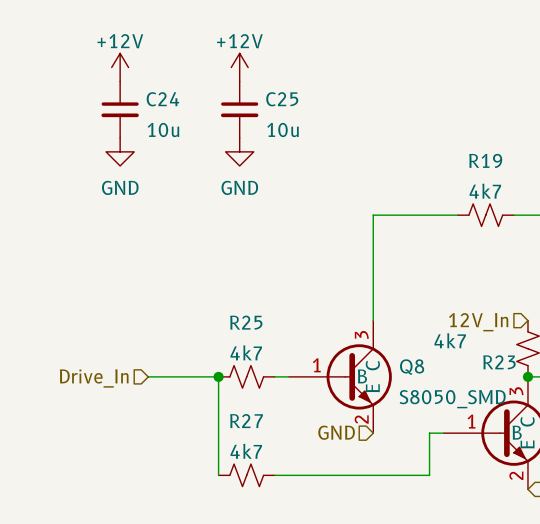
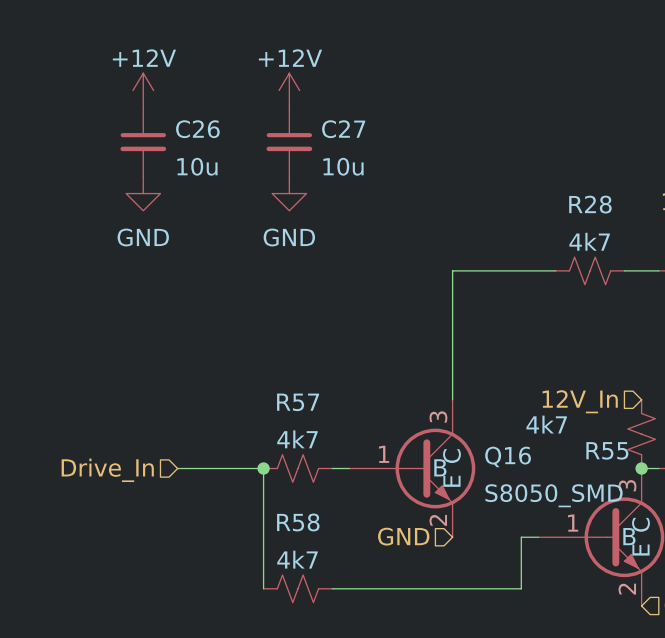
C24 name: C24 (162, 99) -> C26 (197, 129)
C25 name: C25 (282, 99) -> C27 (343, 129)
R19 name: R19 (485, 160) -> R28 (590, 204)
R25 name: R25 (246, 322) -> R57 (298, 402)
R23 name: R23 (499, 362) -> R55 (607, 450)
Q8 name: Q8 (412, 367) -> Q16 (508, 456)
R27 name: R27 (246, 421) -> R58 (298, 522)

